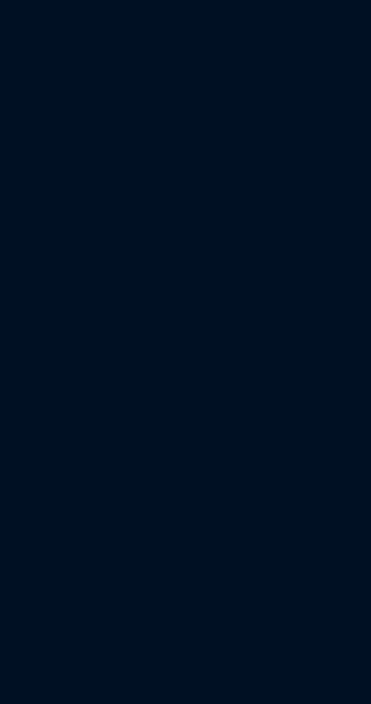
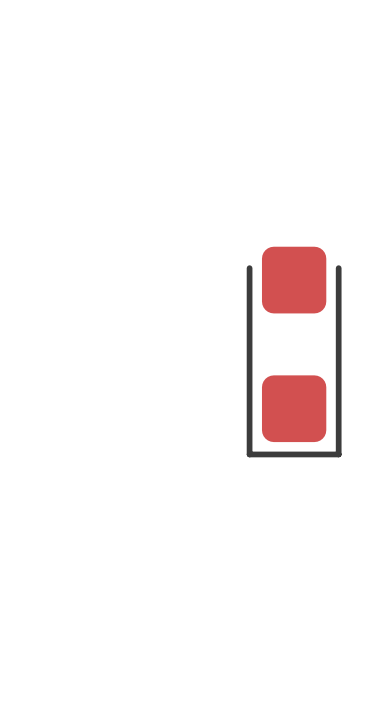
part: none -> (294, 352)

